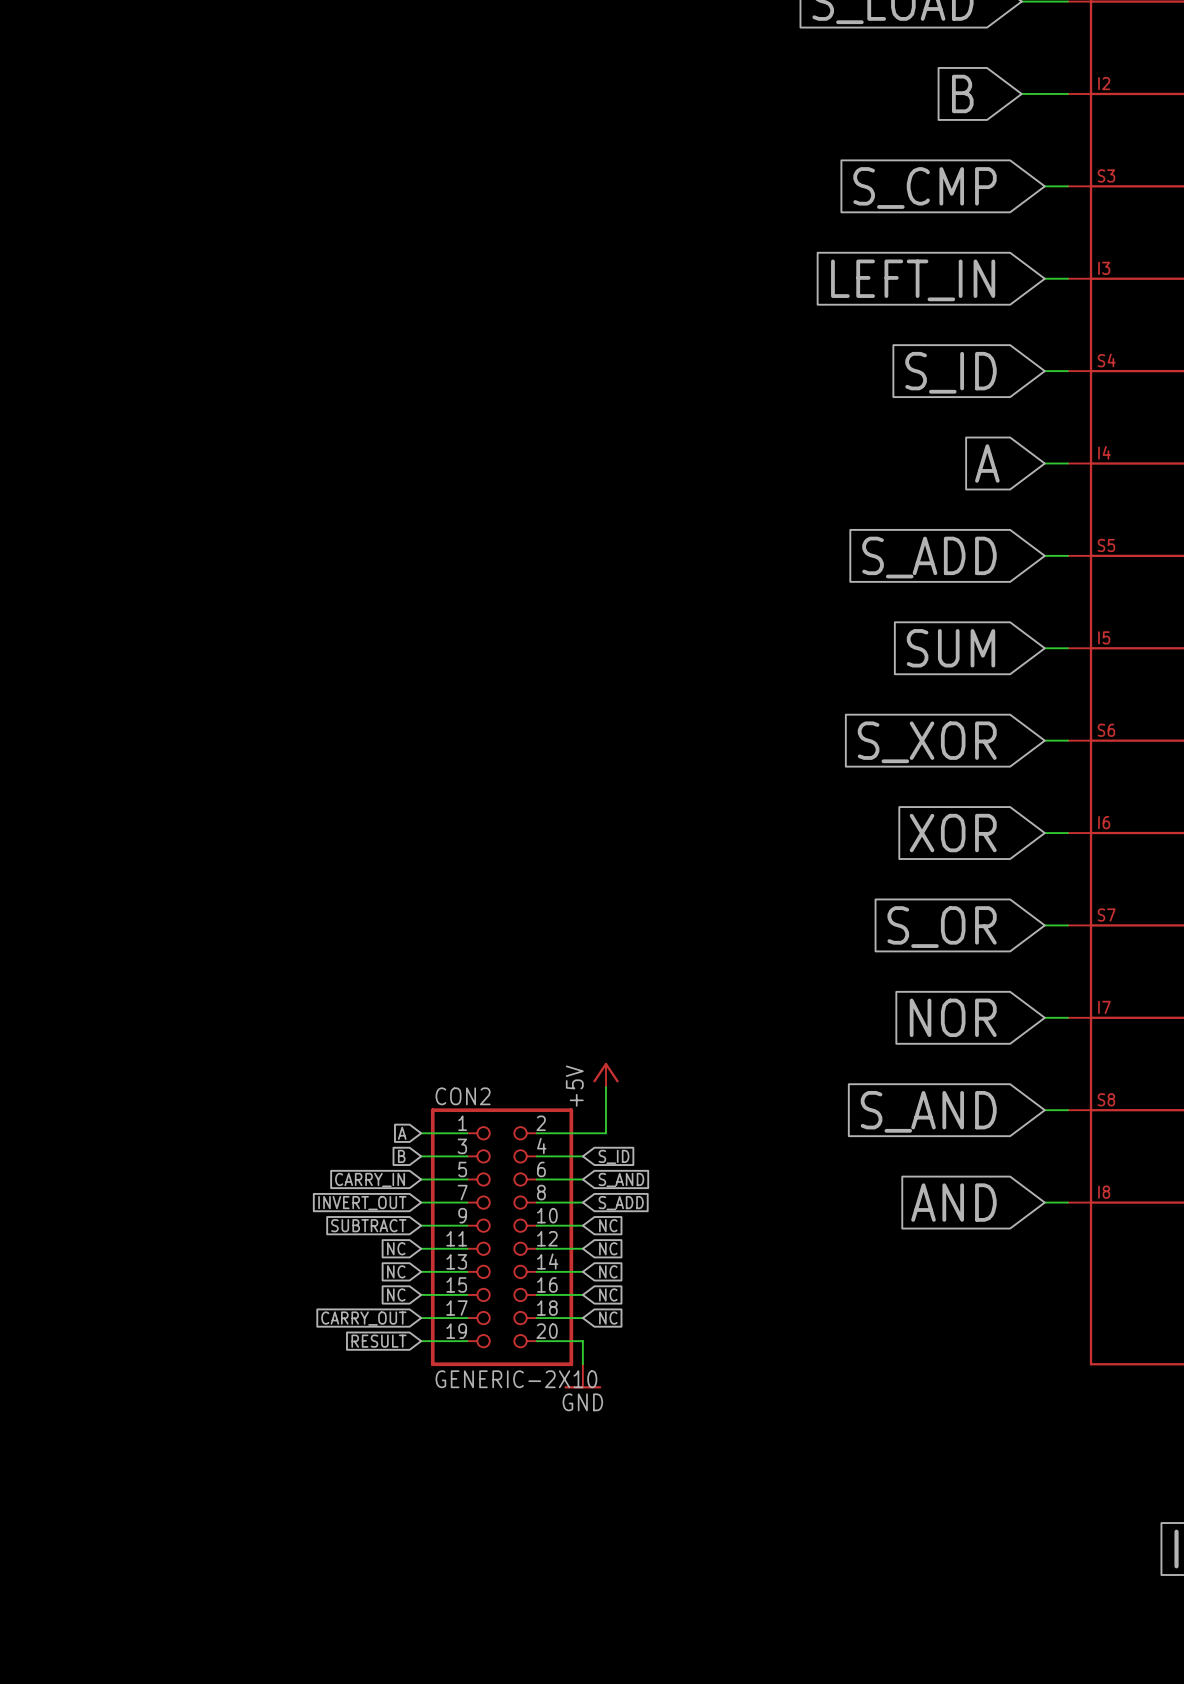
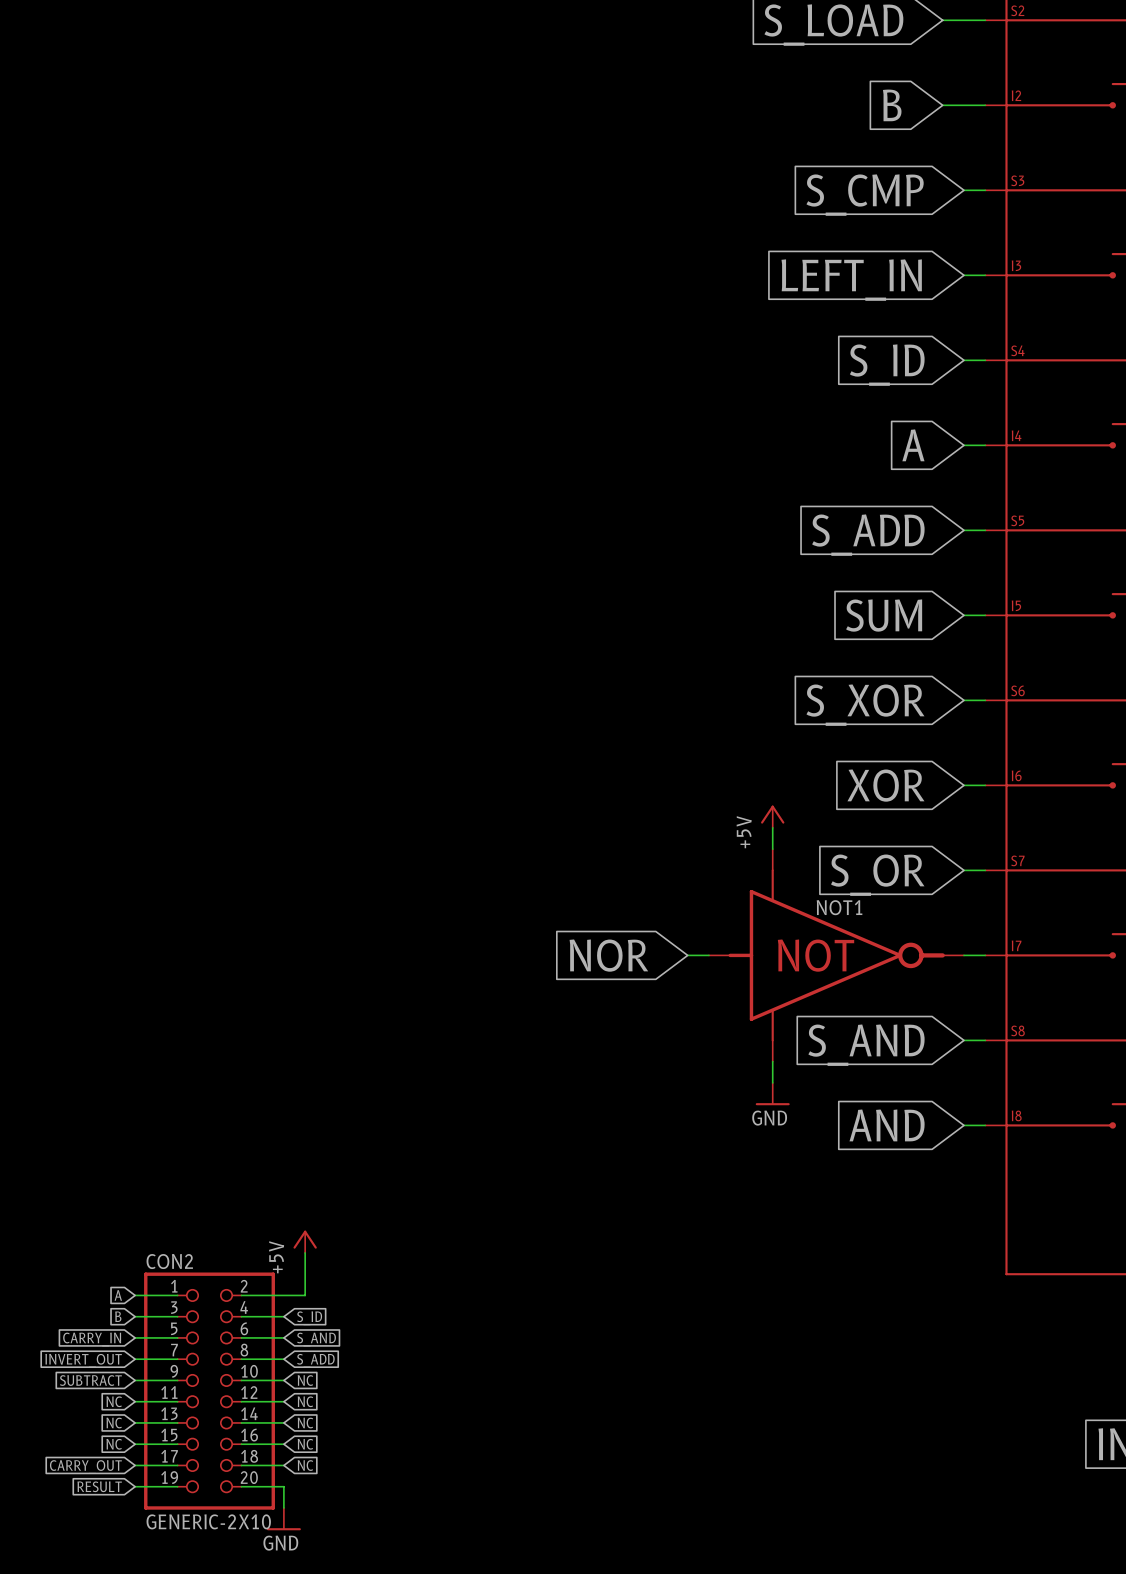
power symbol: none -> +5V (772, 816)
wire: none -> (772, 827) (772, 849)
global label: none -> NOR (608, 955)
wire: none -> (687, 955) (708, 955)
NOT1: none -> (836, 955)
global label: NOR (953, 1017) -> none
power symbol: +5V (605, 1074) -> none
wire: (605, 1087) (605, 1133) (536, 1133) -> none
global label: A (402, 1133) -> none
wire: (421, 1133) (467, 1133) -> none
wire: none -> (772, 1061) (772, 1082)
global label: B (401, 1156) -> none
wire: (421, 1156) (467, 1156) -> none
wire: (536, 1156) (582, 1156) -> none
global label: S_ID (614, 1156) -> none
power symbol: none -> GND (772, 1094)
wire: (421, 1179) (467, 1179) -> none
wire: (536, 1179) (582, 1179) -> none
global label: CARRY_IN (370, 1180) -> none
global label: S_AND (621, 1180) -> none
wire: (421, 1202) (467, 1202) -> none
wire: (536, 1202) (582, 1202) -> none
global label: INVERT_OUT (362, 1203) -> none
global label: S_ADD (621, 1203) -> none
global label: SUBTRACT (368, 1225) -> none
wire: (421, 1225) (467, 1225) -> none
wire: (536, 1225) (582, 1225) -> none
global label: NC (608, 1225) -> none
CON2 position: (502, 1237) -> (209, 1391)
global label: NC (396, 1248) -> none
wire: (421, 1248) (467, 1248) -> none
wire: (536, 1248) (582, 1248) -> none
global label: NC (608, 1248) -> none
global label: NC (396, 1271) -> none
wire: (421, 1271) (467, 1271) -> (241, 1316) (283, 1316)
wire: (536, 1271) (582, 1271) -> none
global label: NC (608, 1271) -> none
global label: NC (396, 1294) -> none
wire: (421, 1294) (467, 1294) -> (241, 1337) (283, 1337)
wire: (536, 1294) (582, 1294) -> none
global label: NC (608, 1294) -> none
global label: CARRY_OUT (363, 1318) -> none
wire: (421, 1318) (467, 1318) -> (241, 1359) (283, 1359)
wire: (536, 1318) (582, 1318) -> none
global label: NC (608, 1318) -> none
power symbol: none -> +5V (305, 1241)
wire: none -> (305, 1252) (305, 1295) (241, 1295)
global label: RESULT (378, 1341) -> none
wire: (421, 1341) (467, 1341) -> (241, 1380) (283, 1380)
wire: (536, 1341) (582, 1341) (582, 1364) -> none
power symbol: GND (582, 1376) -> none
global label: none -> A (118, 1295)
wire: none -> (135, 1295) (177, 1295)
global label: none -> B (118, 1316)
wire: none -> (135, 1316) (177, 1316)
global label: none -> S_ID (309, 1318)
wire: none -> (135, 1337) (177, 1337)
global label: none -> CARRY_IN (92, 1339)
global label: none -> S_AND (316, 1339)
wire: none -> (135, 1359) (177, 1359)
global label: none -> INVERT_OUT (83, 1360)
global label: none -> S_ADD (315, 1360)
global label: none -> SUBTRACT (90, 1380)
wire: none -> (135, 1380) (177, 1380)
global label: none -> NC (305, 1380)
global label: none -> NC (114, 1401)
wire: none -> (135, 1401) (177, 1401)
wire: none -> (241, 1401) (283, 1401)
global label: none -> NC (305, 1401)
global label: none -> NC (114, 1423)
wire: none -> (135, 1422) (177, 1422)
wire: none -> (241, 1422) (283, 1422)
global label: none -> NC (305, 1423)
global label: none -> NC (114, 1444)
wire: none -> (135, 1444) (177, 1444)
wire: none -> (241, 1444) (283, 1444)
global label: none -> NC (305, 1444)
global label: none -> CARRY_OUT (85, 1467)
wire: none -> (135, 1465) (177, 1465)
wire: none -> (241, 1465) (283, 1465)
global label: none -> NC (305, 1465)
global label: none -> RESULT (99, 1486)
wire: none -> (135, 1486) (177, 1486)
wire: none -> (241, 1486) (283, 1486) (283, 1507)
power symbol: none -> GND (283, 1519)

